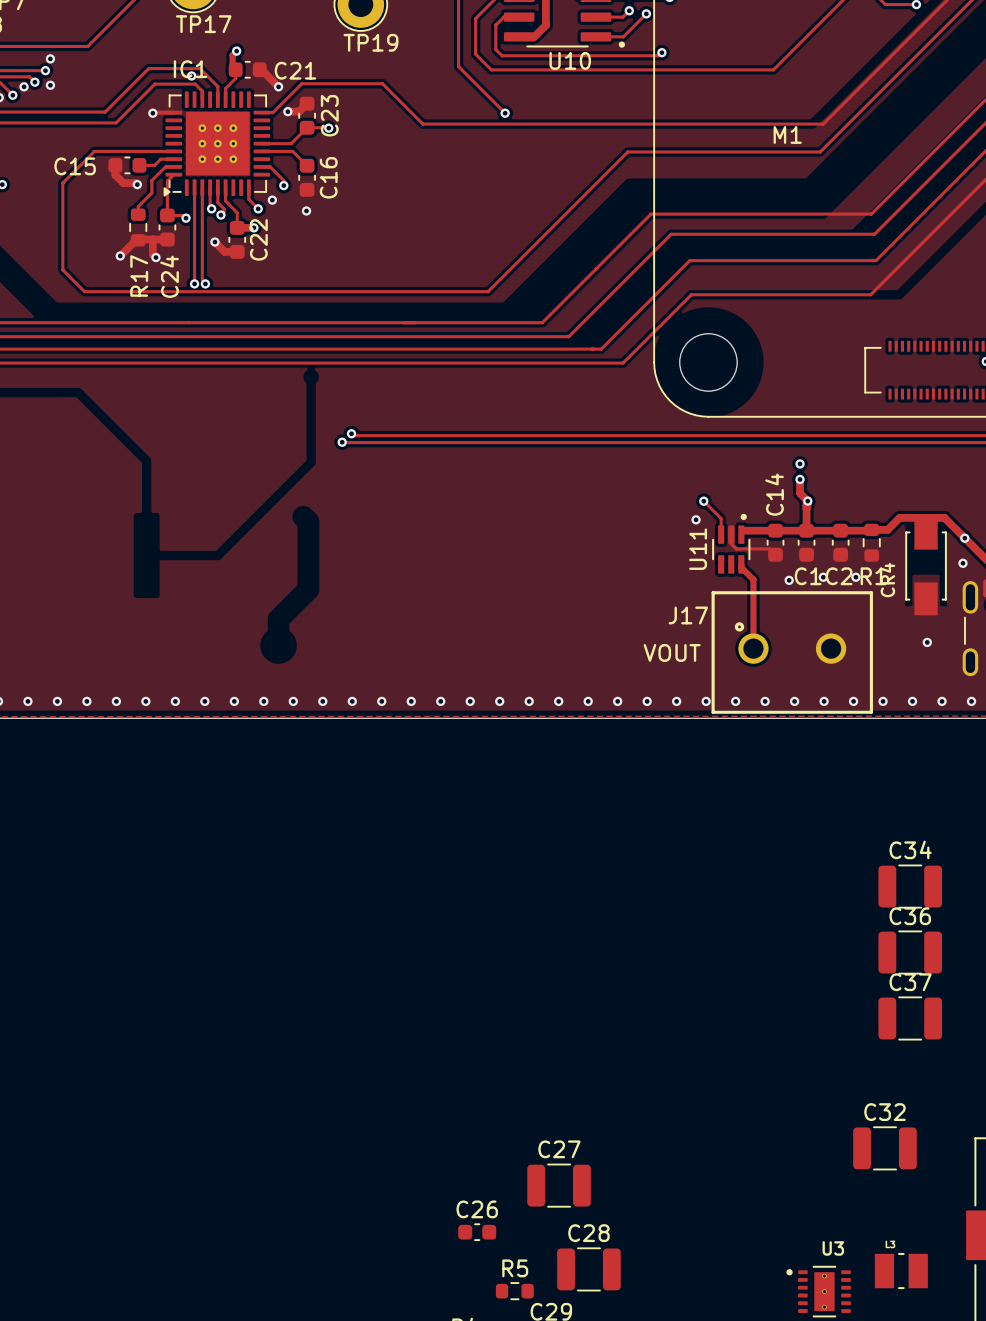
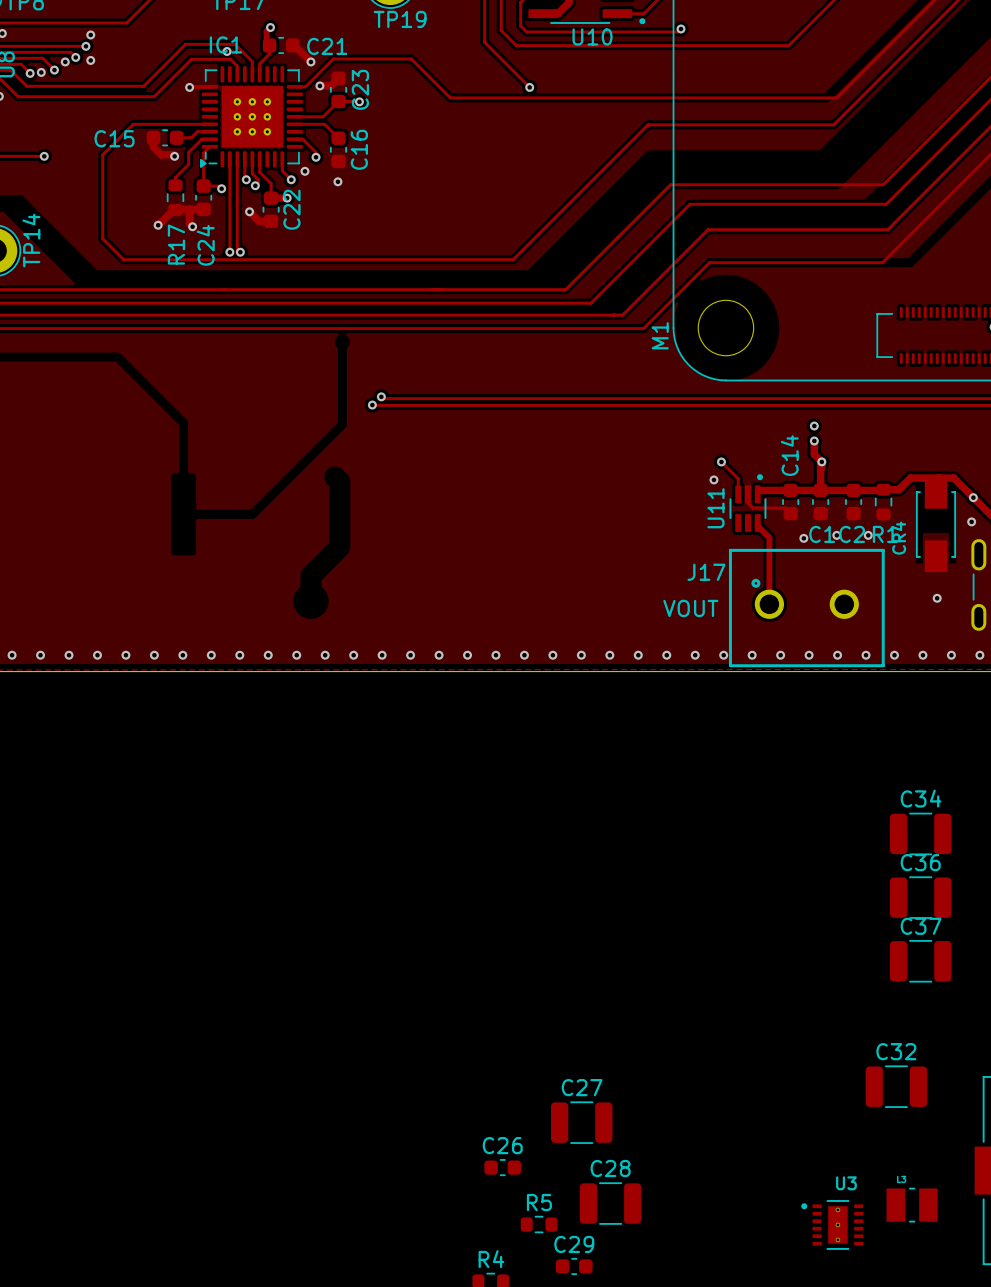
M1 name rotation: 0° (787, 134) -> 90° counterclockwise (660, 335)
M1 name position: M1 (787, 134) -> M1 (660, 335)

